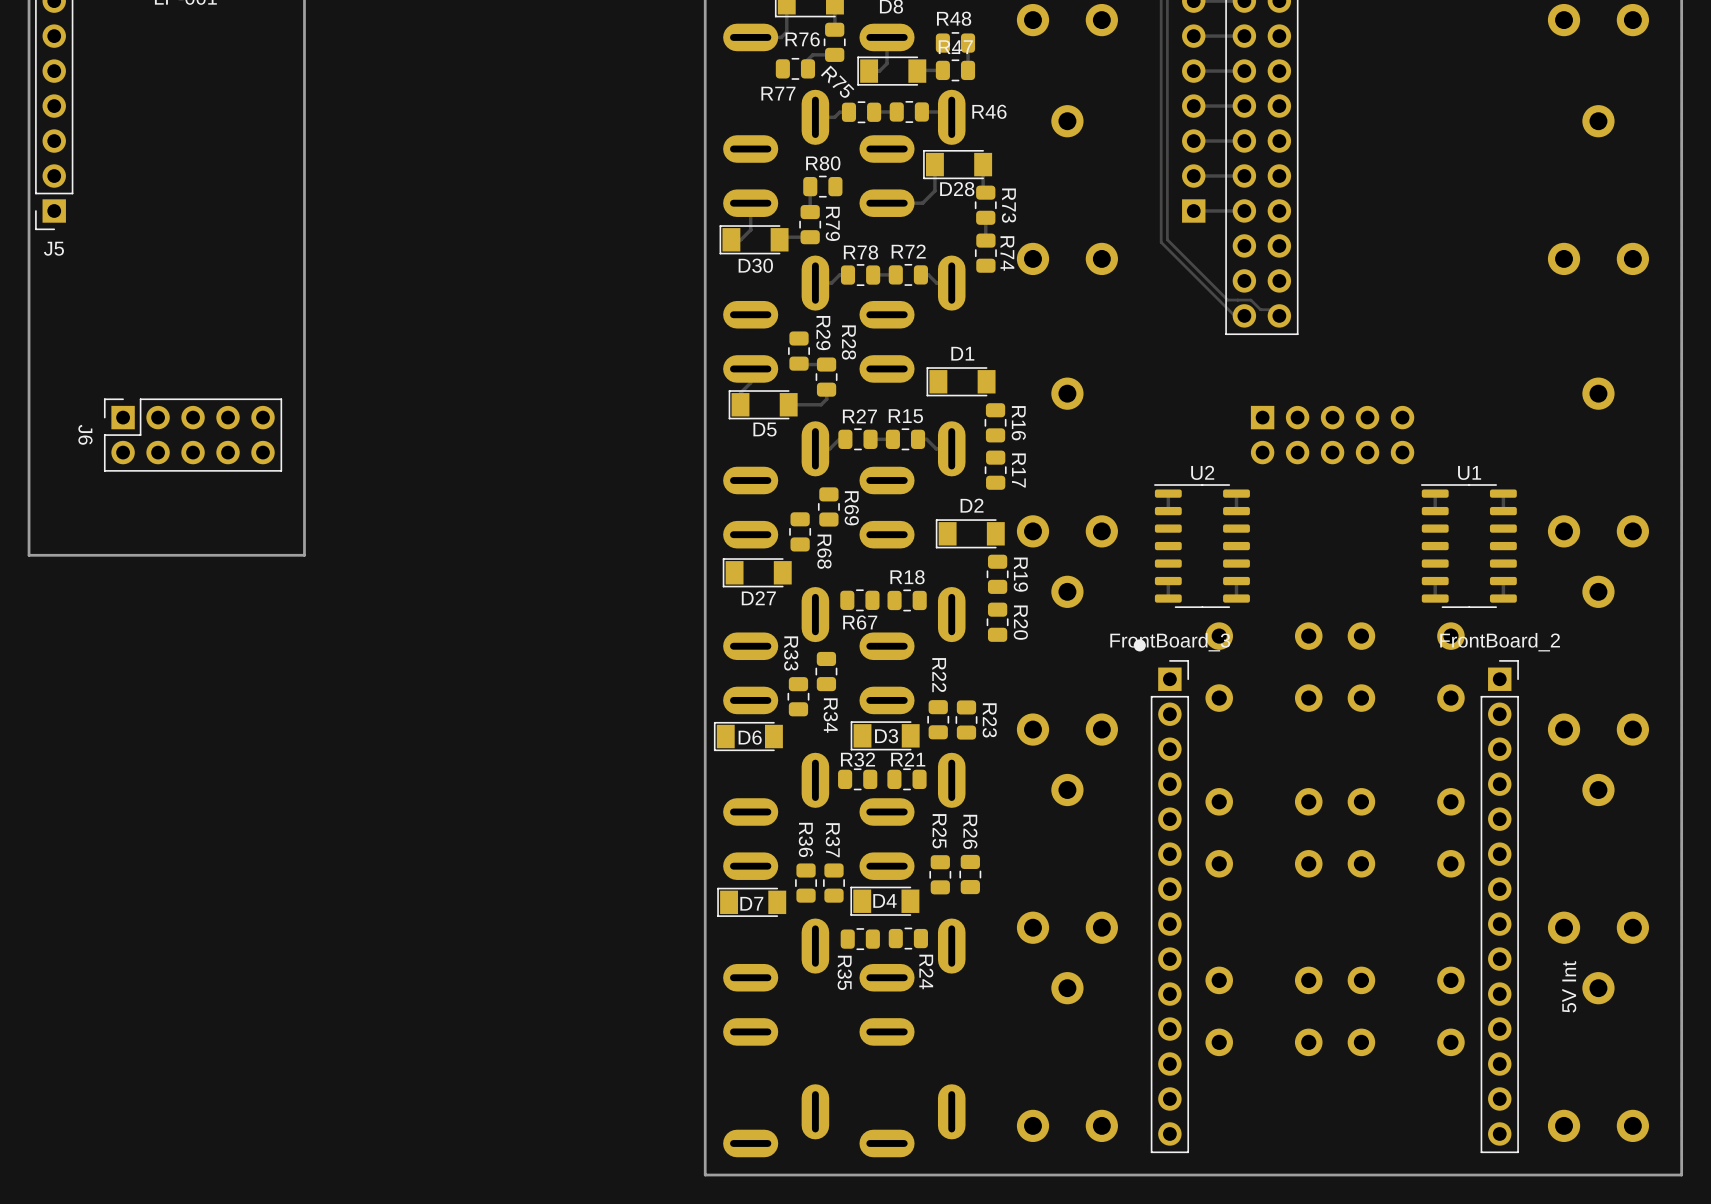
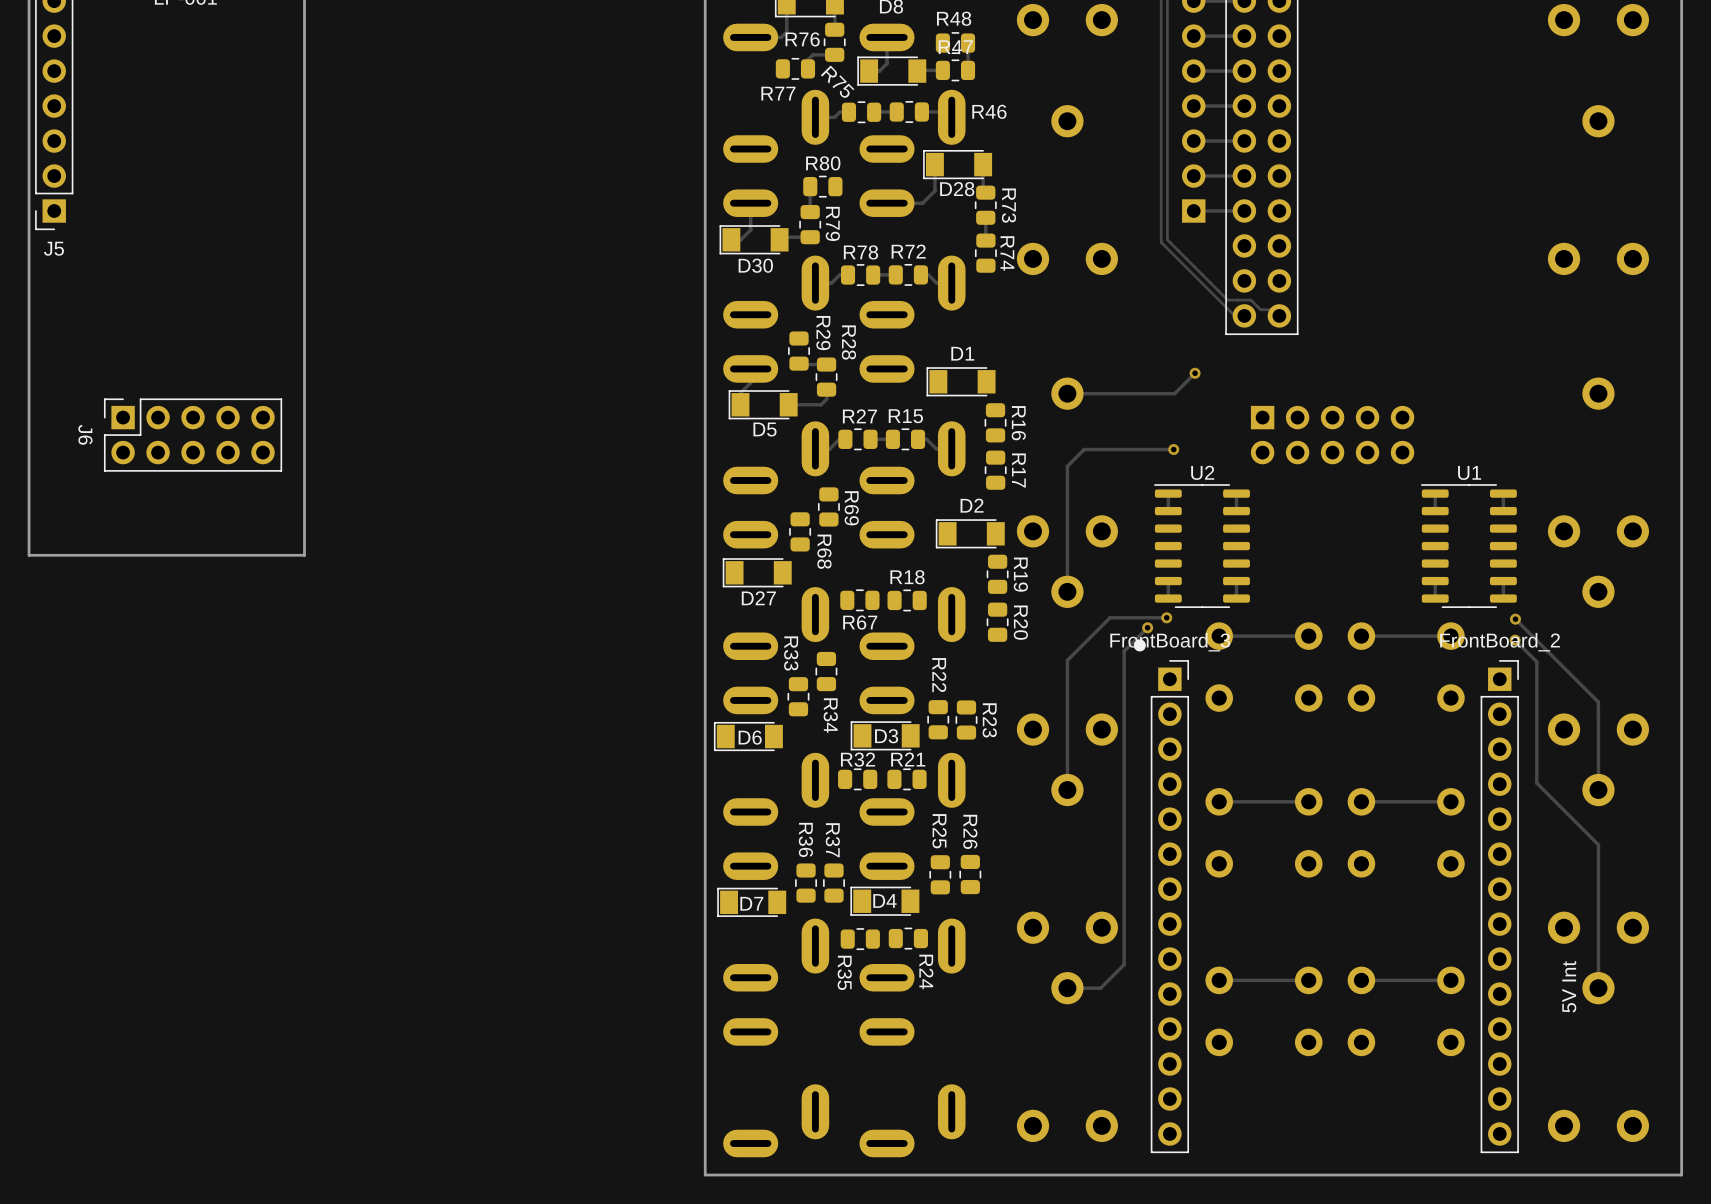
track: none -> (1195, 373) (1174, 393) (1067, 393)
via: none -> (1195, 373)
track: none -> (1173, 449) (1084, 449) (1067, 466) (1067, 591)
via: none -> (1173, 449)
track: none -> (1166, 617) (1110, 617) (1067, 660) (1067, 790)
via: none -> (1166, 617)
track: none -> (1515, 619) (1598, 702) (1598, 719)
via: none -> (1515, 619)
track: none -> (1147, 627) (1124, 651) (1124, 964) (1100, 988) (1067, 988)
via: none -> (1147, 627)
track: none -> (1308, 636) (1219, 636)
track: none -> (1450, 636) (1361, 636)
track: none -> (1515, 640) (1536, 661) (1536, 783) (1598, 844) (1598, 988)
via: none -> (1515, 640)
track: none -> (1598, 719) (1598, 790)
track: none -> (1308, 801) (1219, 801)
track: none -> (1450, 801) (1361, 801)
track: none -> (1308, 980) (1219, 980)
track: none -> (1450, 980) (1361, 980)

